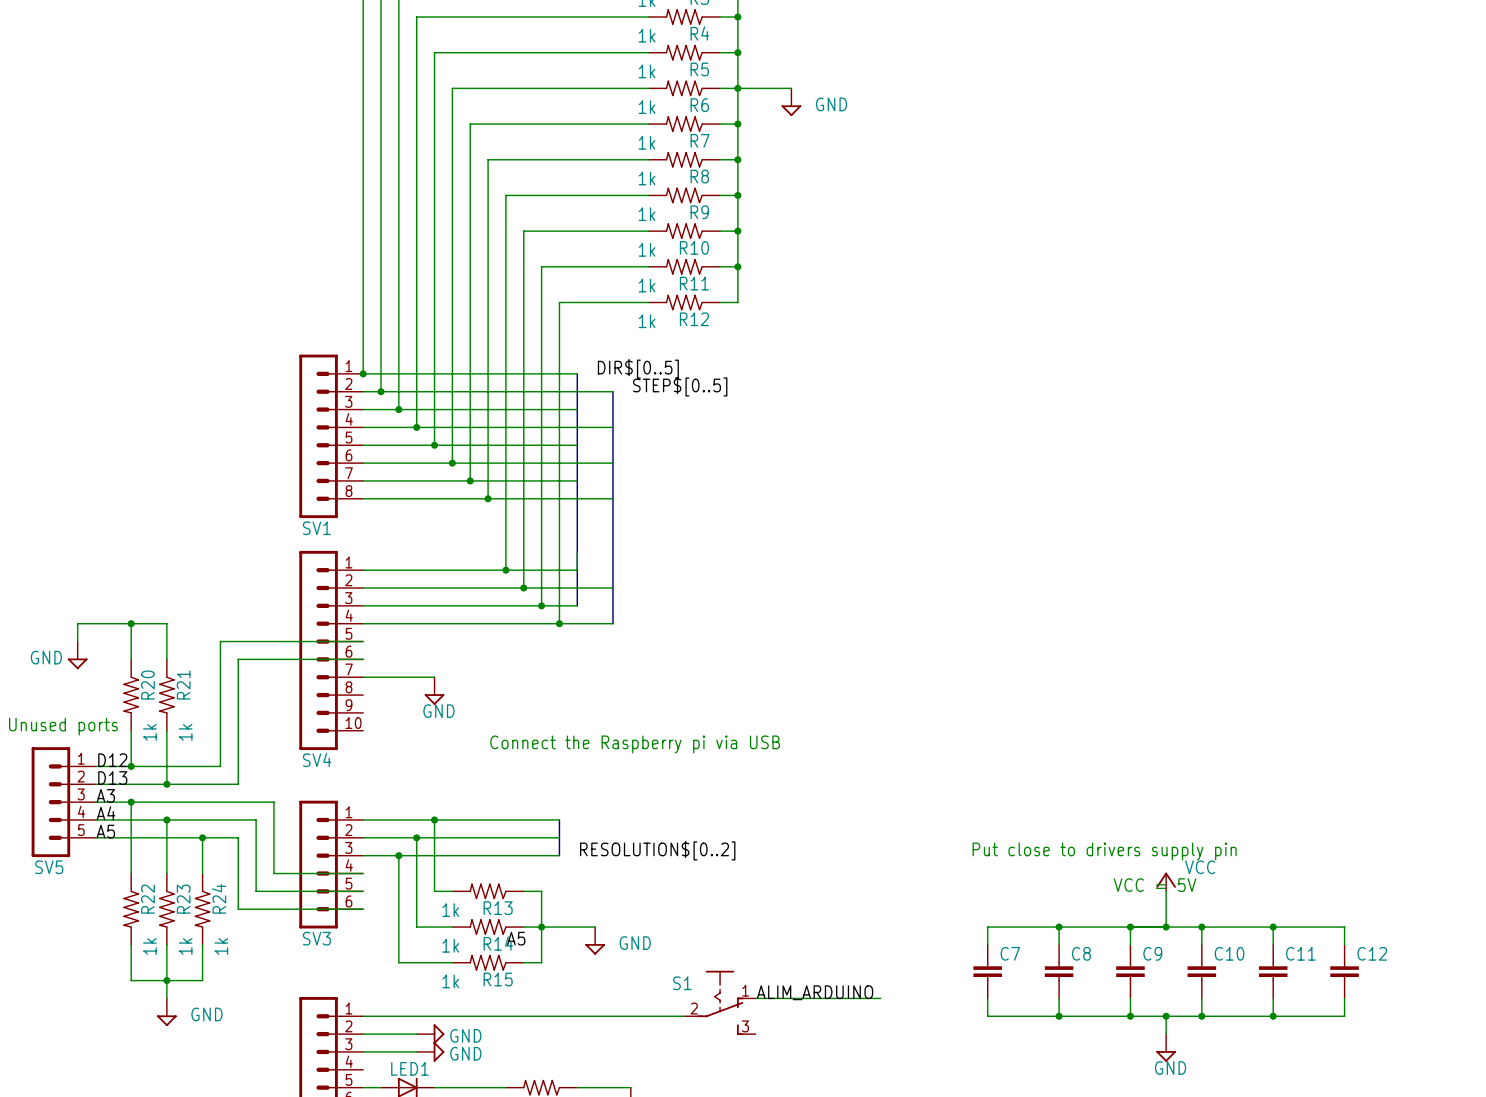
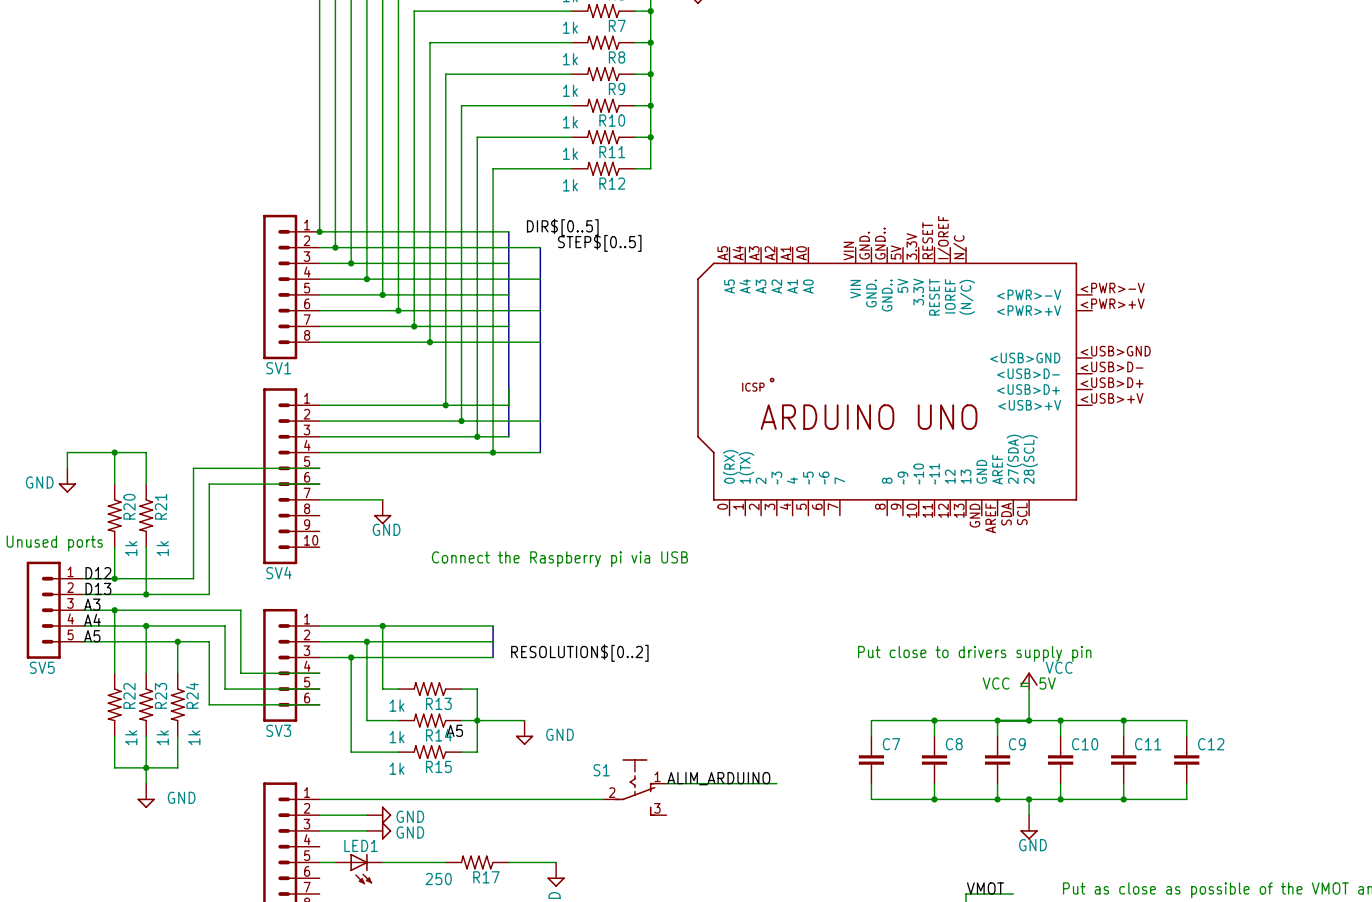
part: none -> (894, 381)

